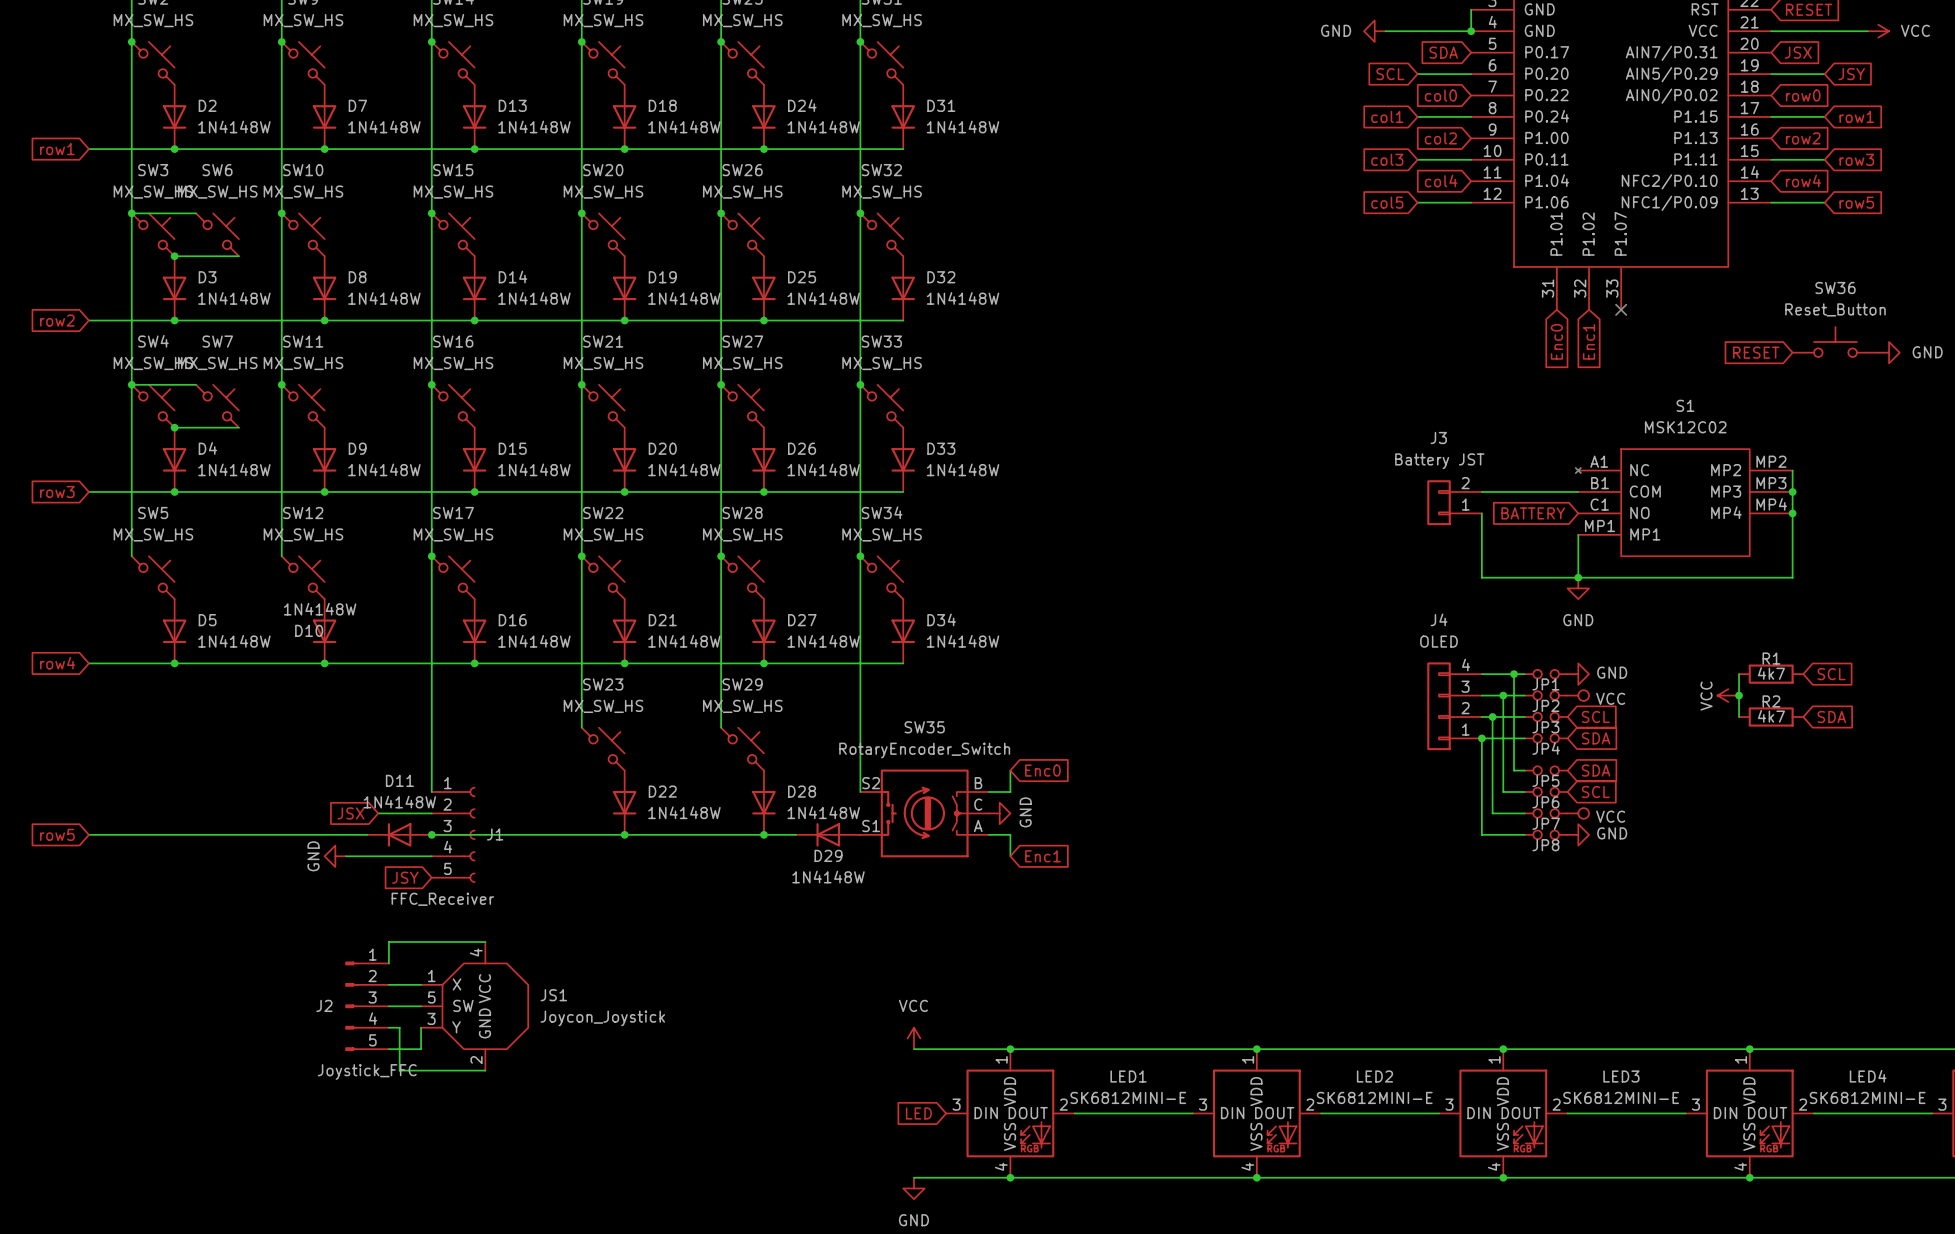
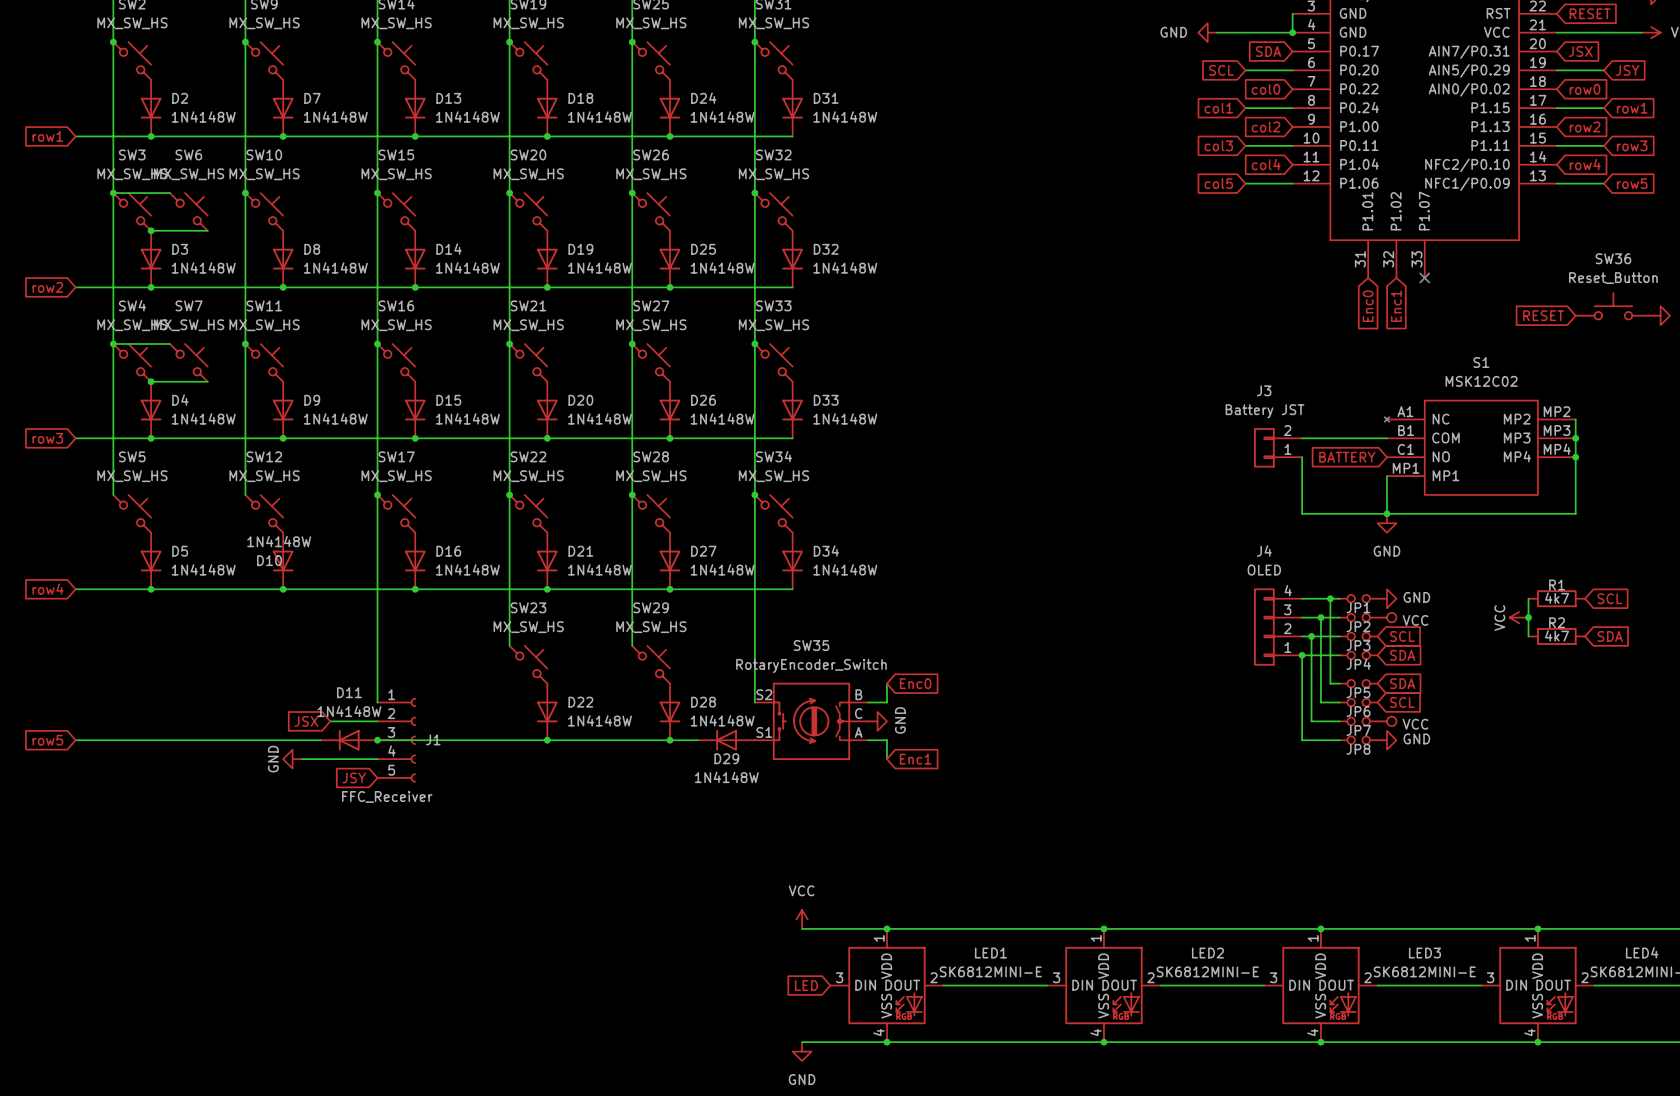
wire: (485, 942) (388, 942) (388, 963) -> none
wire: (388, 984) (421, 984) -> none
J2: Joystick_FFC (367, 1006) -> none
wire: (388, 1006) (421, 1006) -> none
JS1: Joycon_Joystick (474, 1006) -> none
wire: (388, 1027) (399, 1027) (399, 1070) (485, 1070) -> none
wire: (421, 1027) (421, 1049) (388, 1049) -> none

